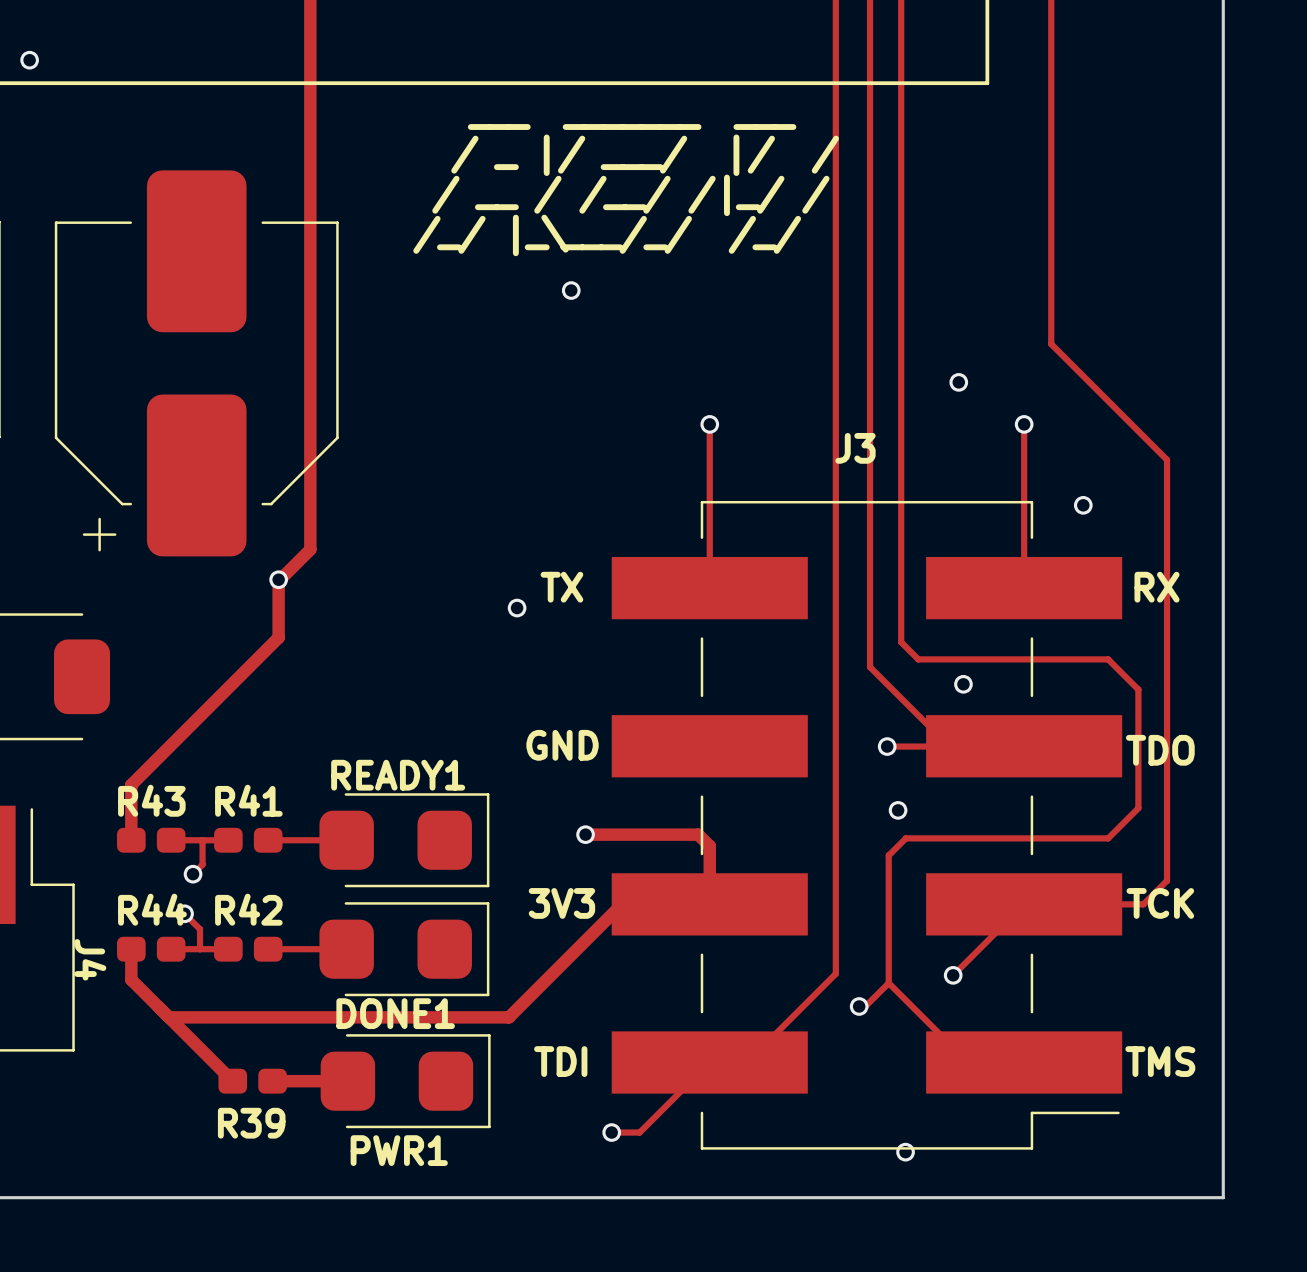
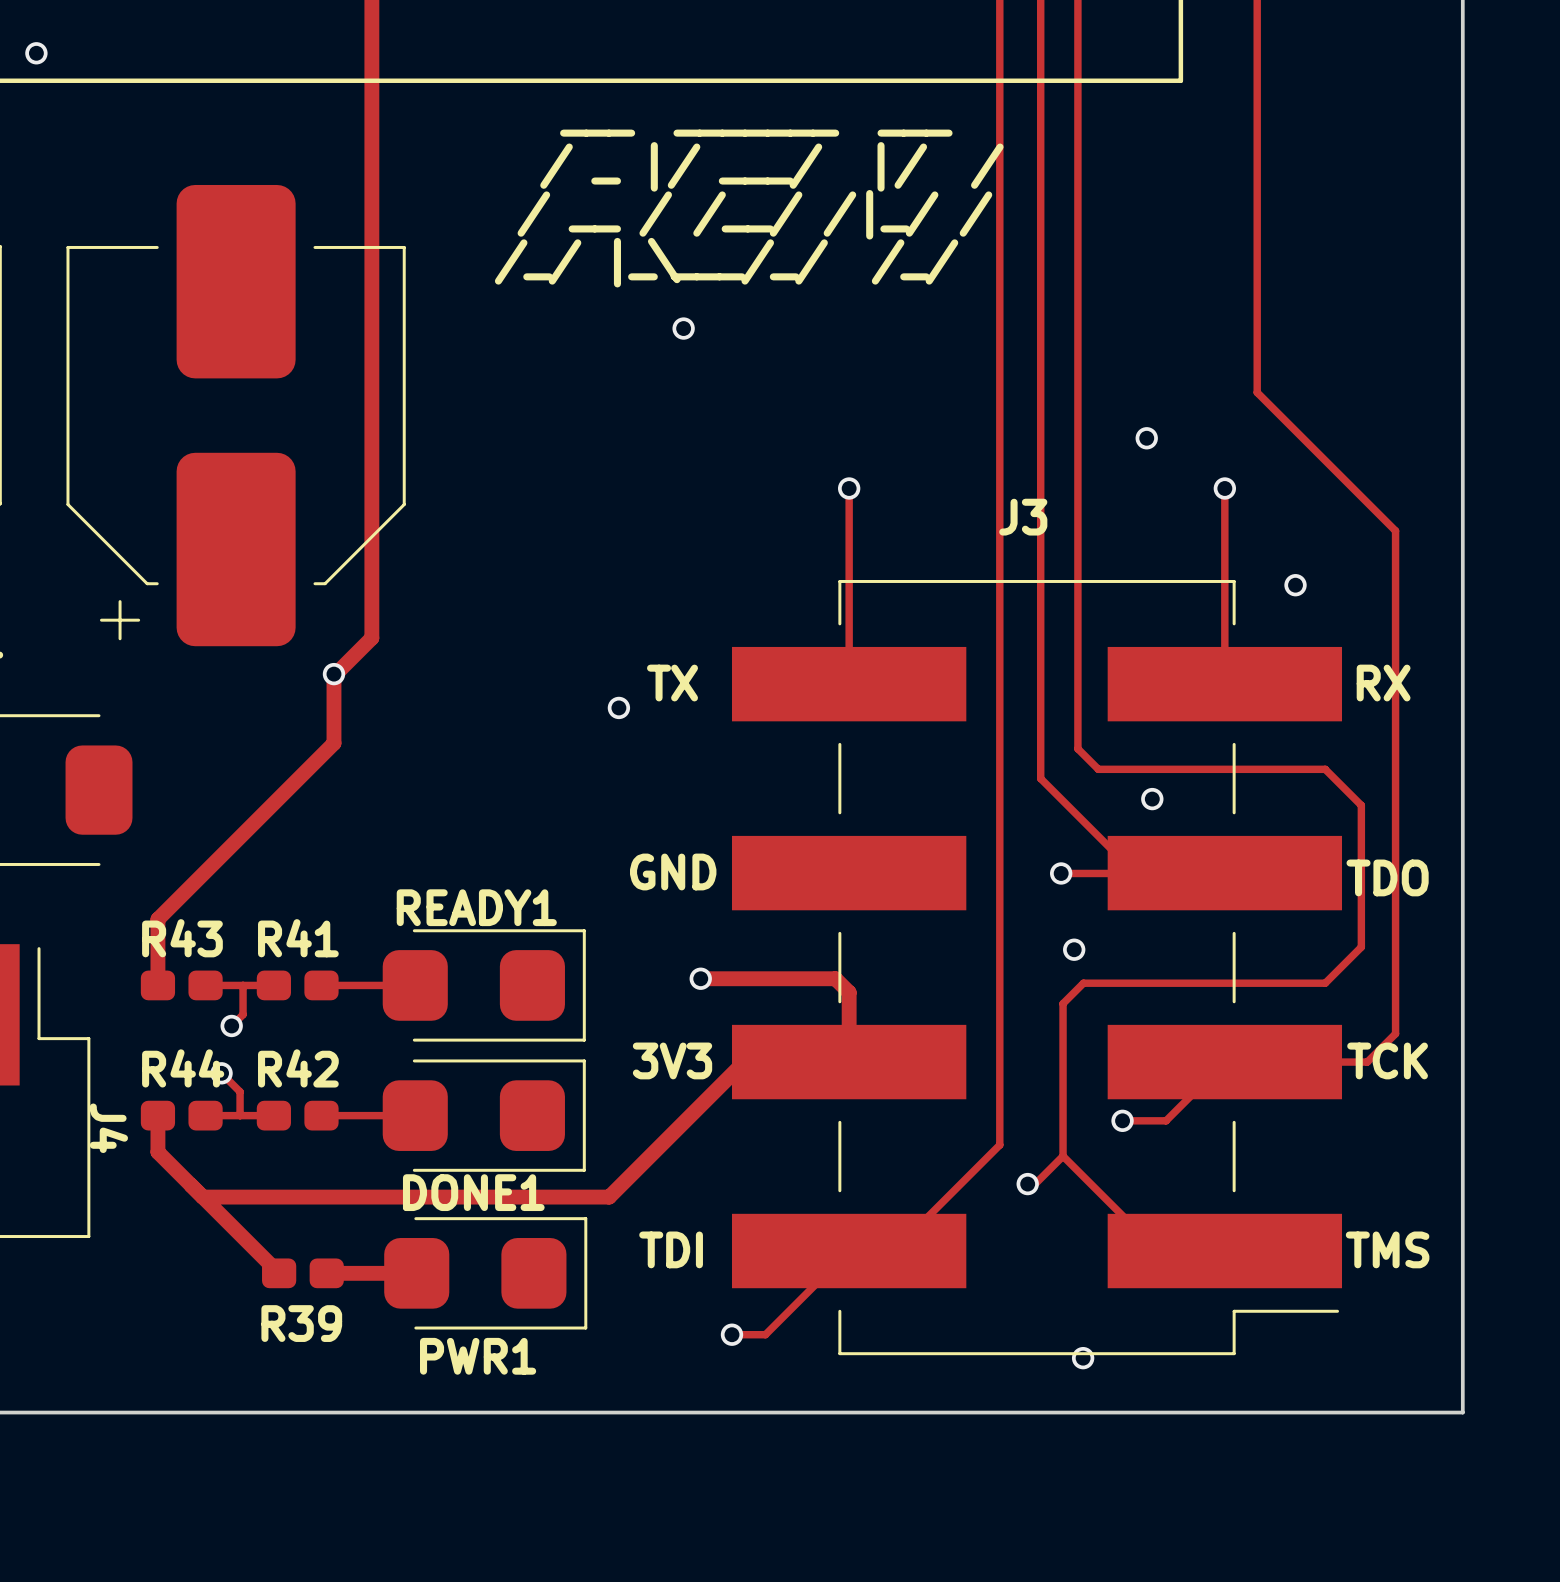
track: (974, 953) (953, 975) -> (1166, 1120) (1122, 1120)
via position: (953, 975) -> (1122, 1120)

